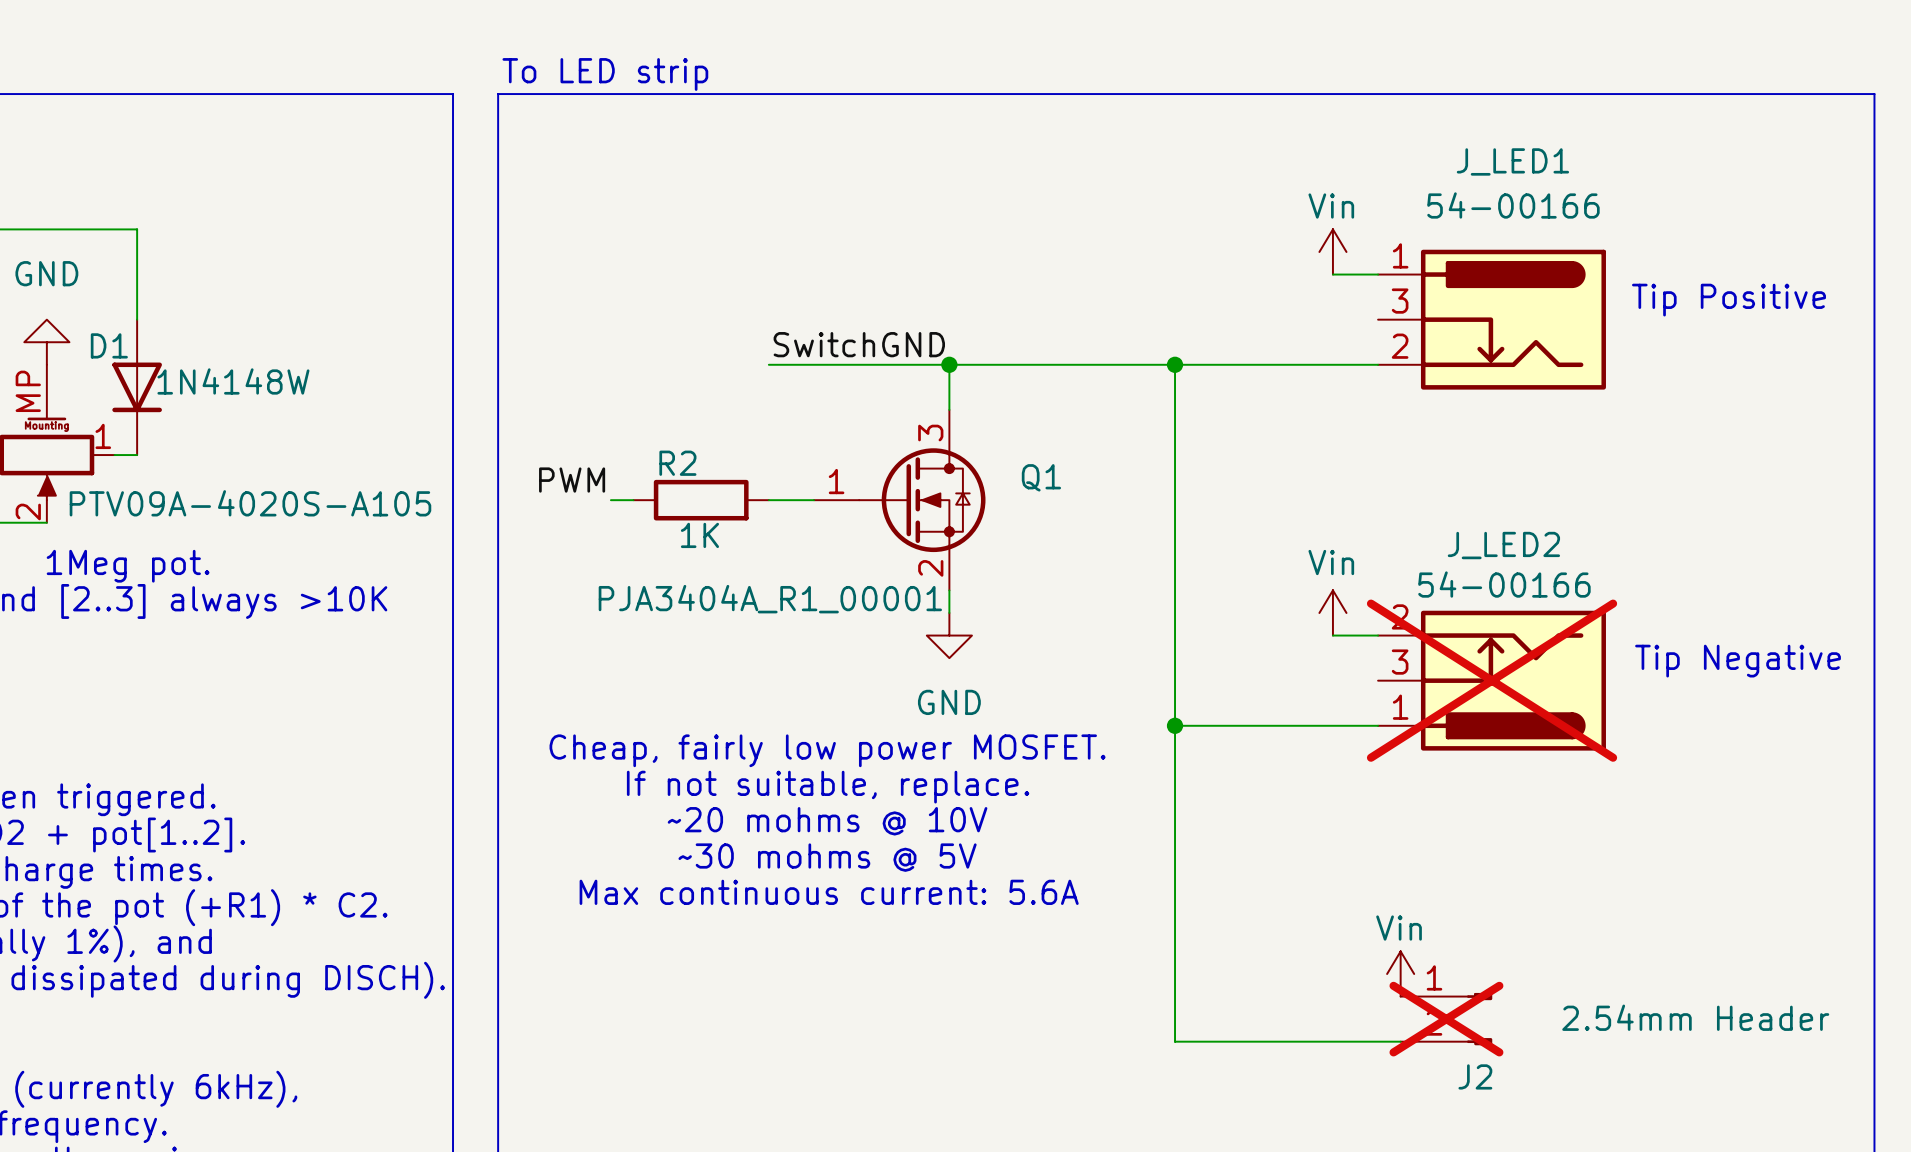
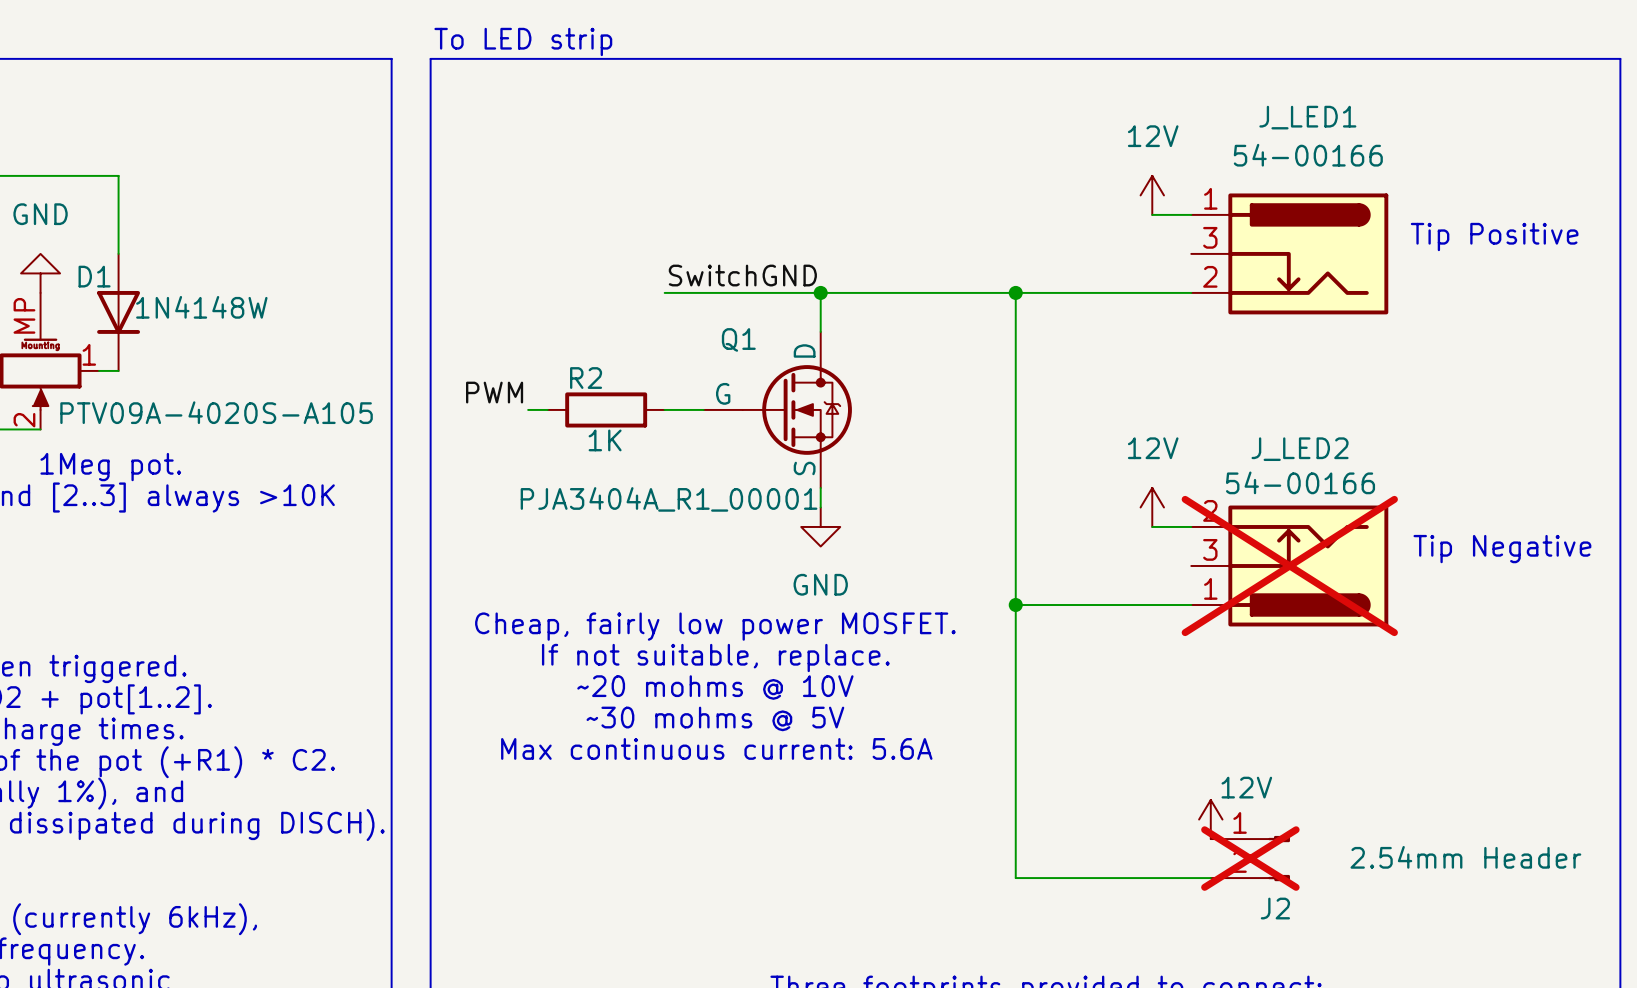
power symbol: Vin (1332, 251) -> 12V (1152, 195)
Q1 symbol: [814, 409, 986, 591] -> [703, 331, 852, 488]
Q1 name position: Q1 (1041, 477) -> Q1 (738, 339)
power symbol: Vin (1332, 612) -> 12V (1152, 507)
power symbol: Vin (1400, 973) -> 12V (1210, 819)

